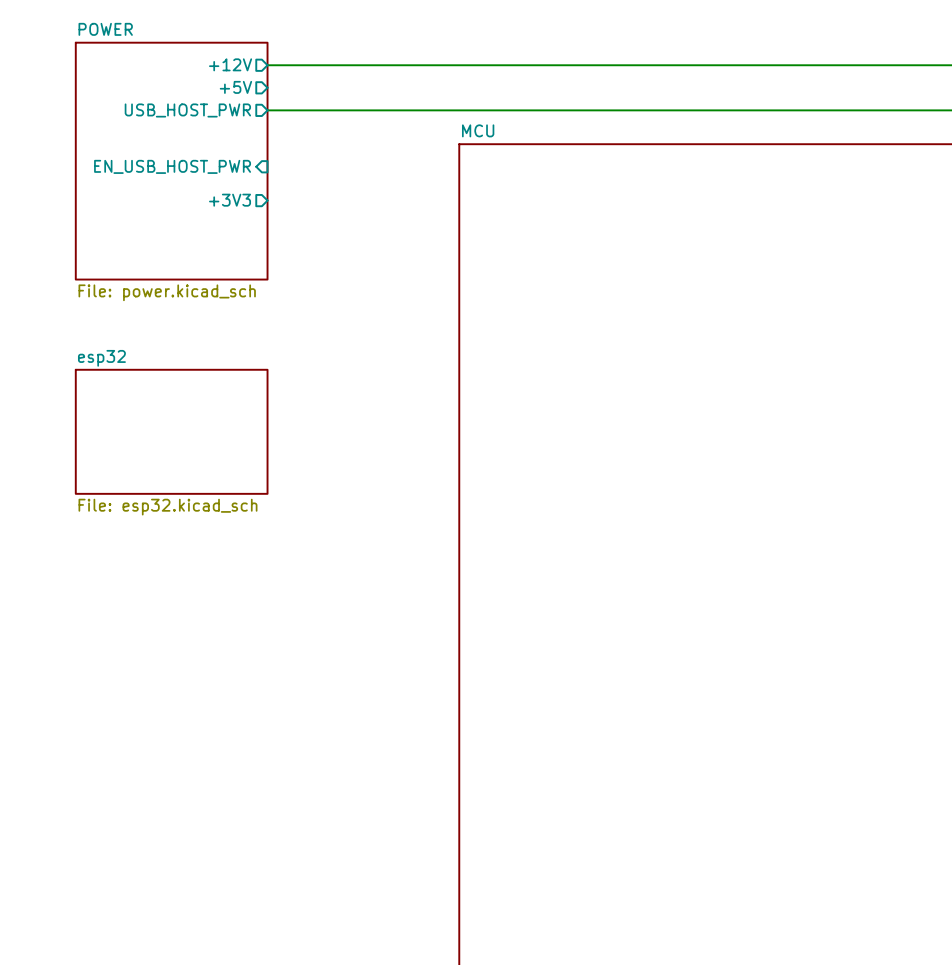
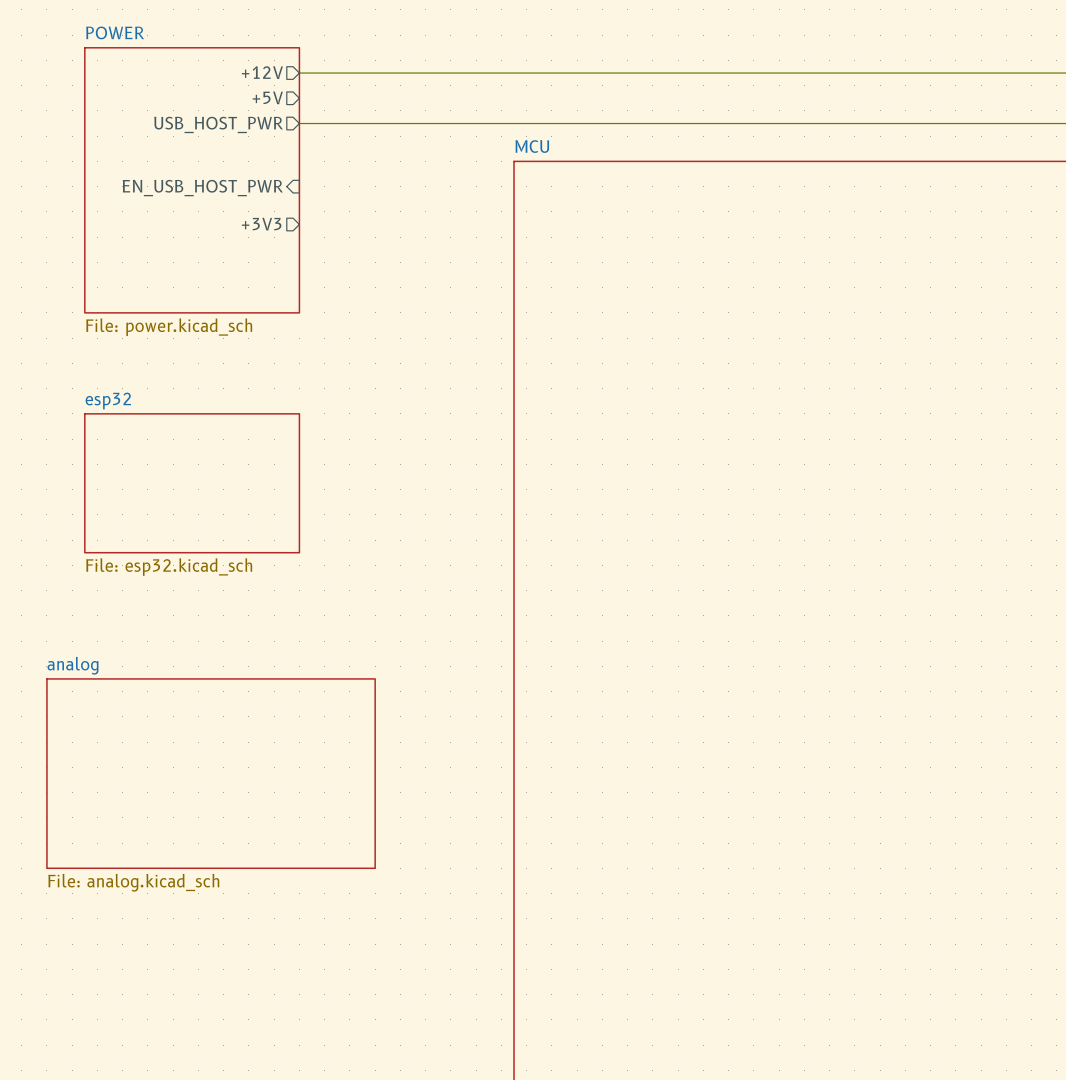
sheet analog: none -> File: analog.kicad_sch (211, 773)

